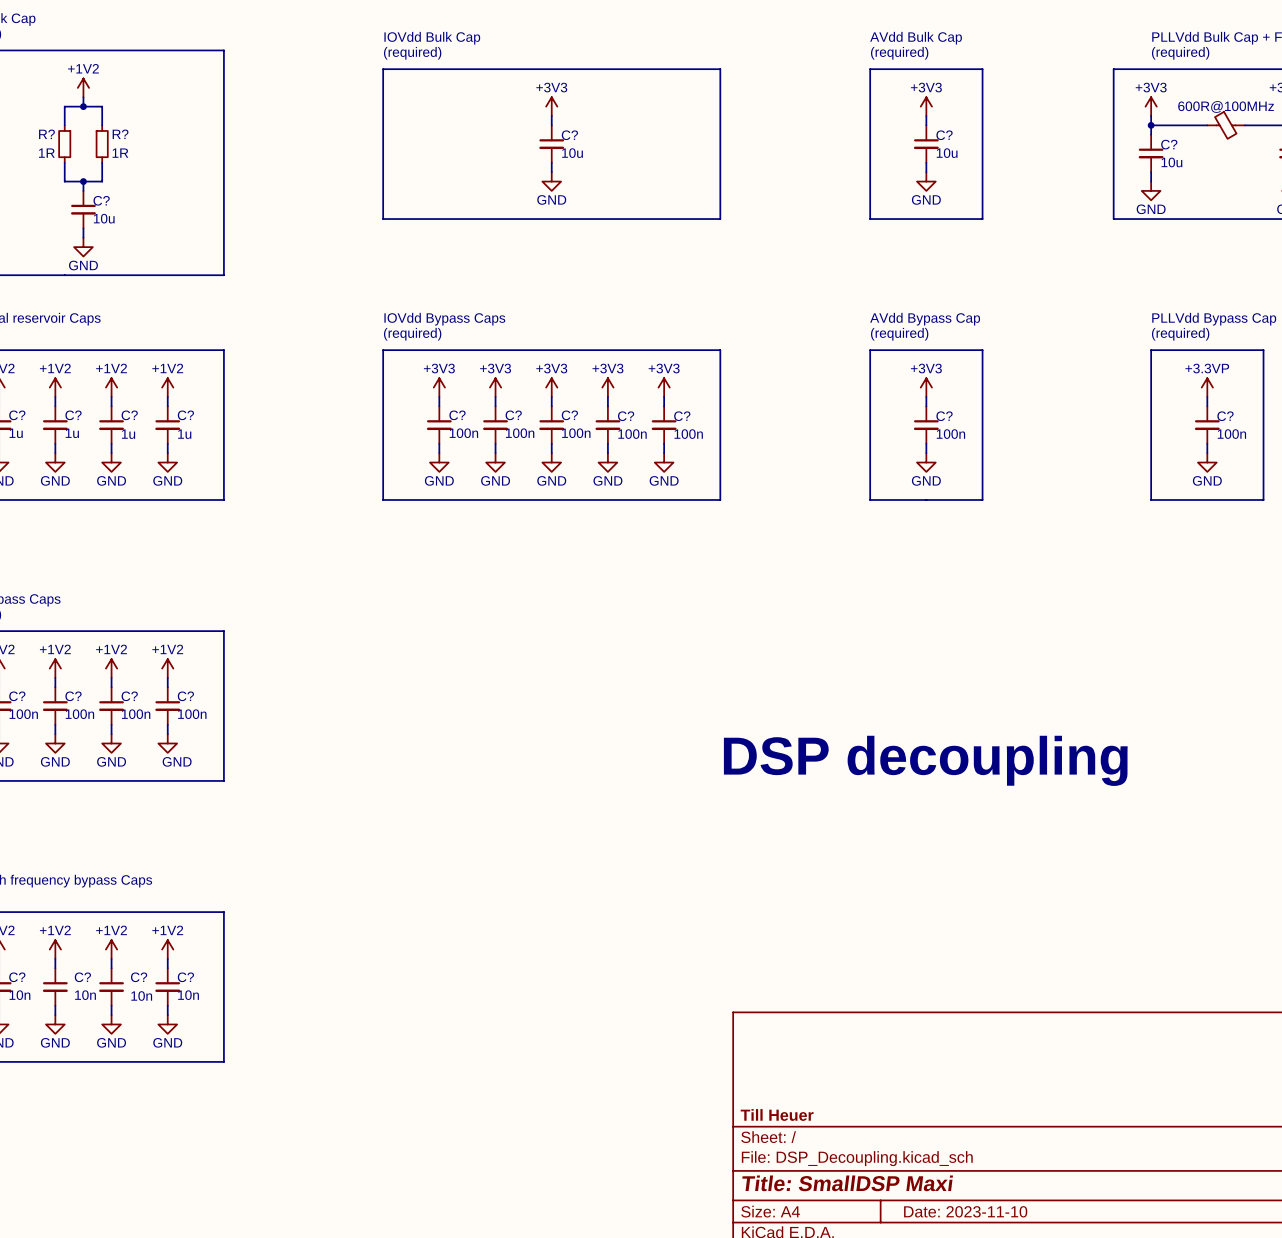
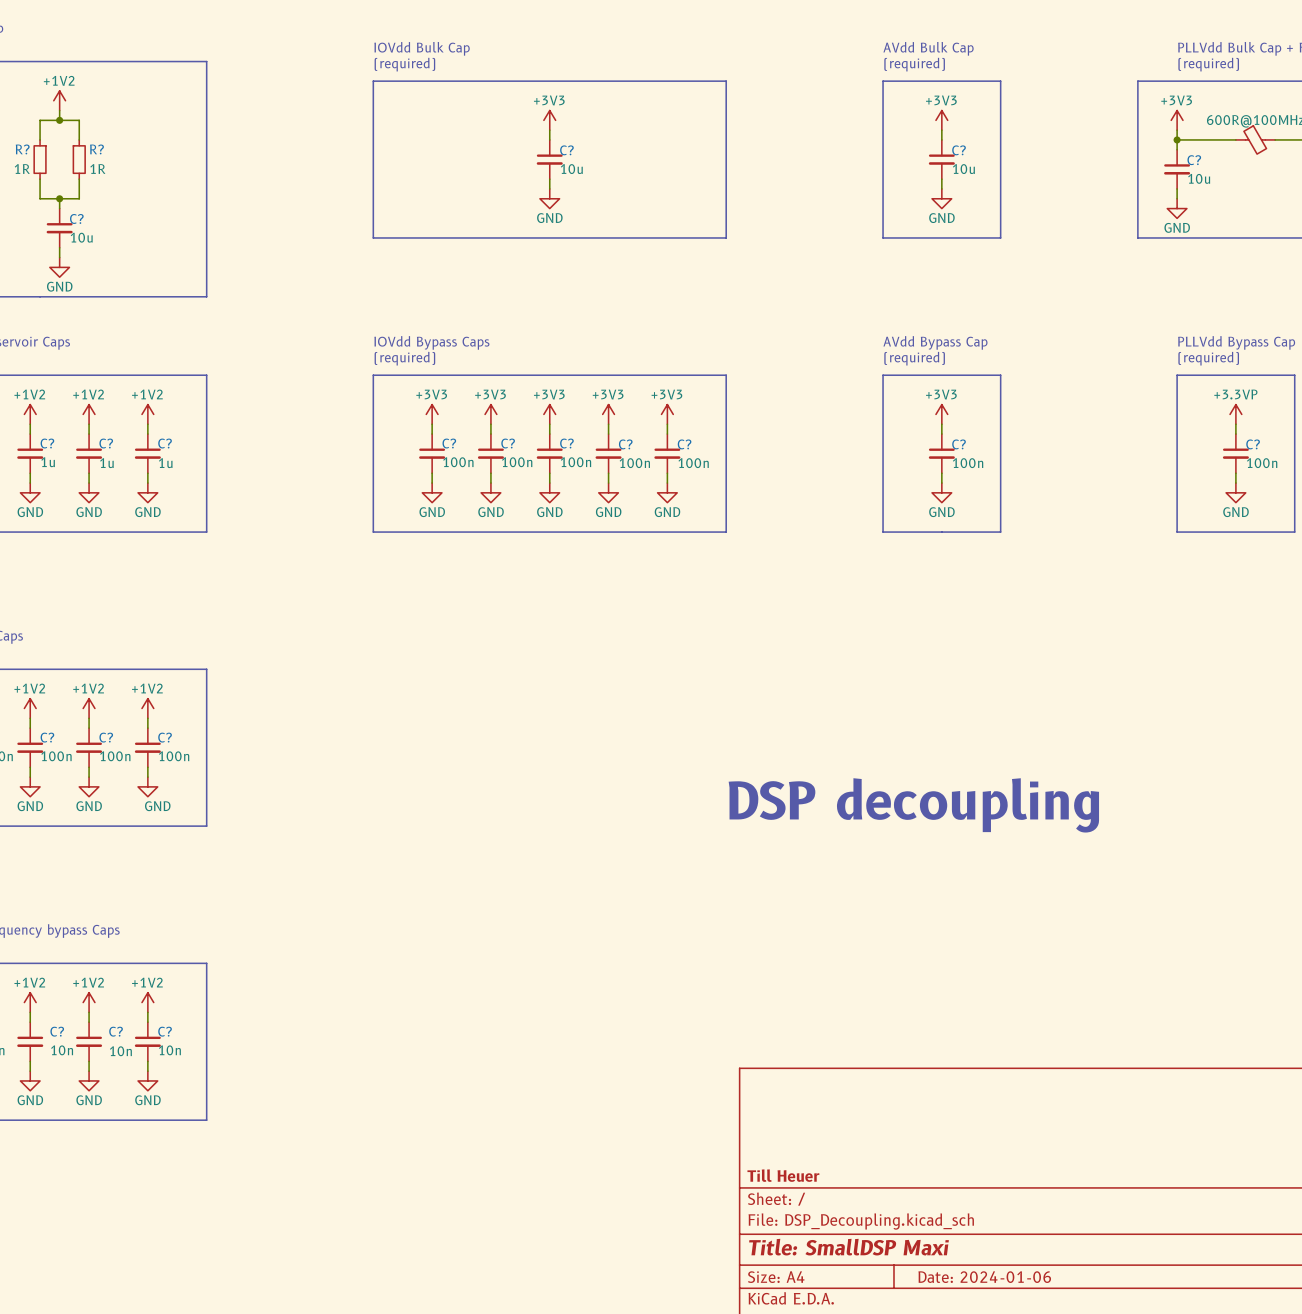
title block: Date: 2023-11-10 (965, 1211) -> Date: 2024-01-06 (984, 1277)

